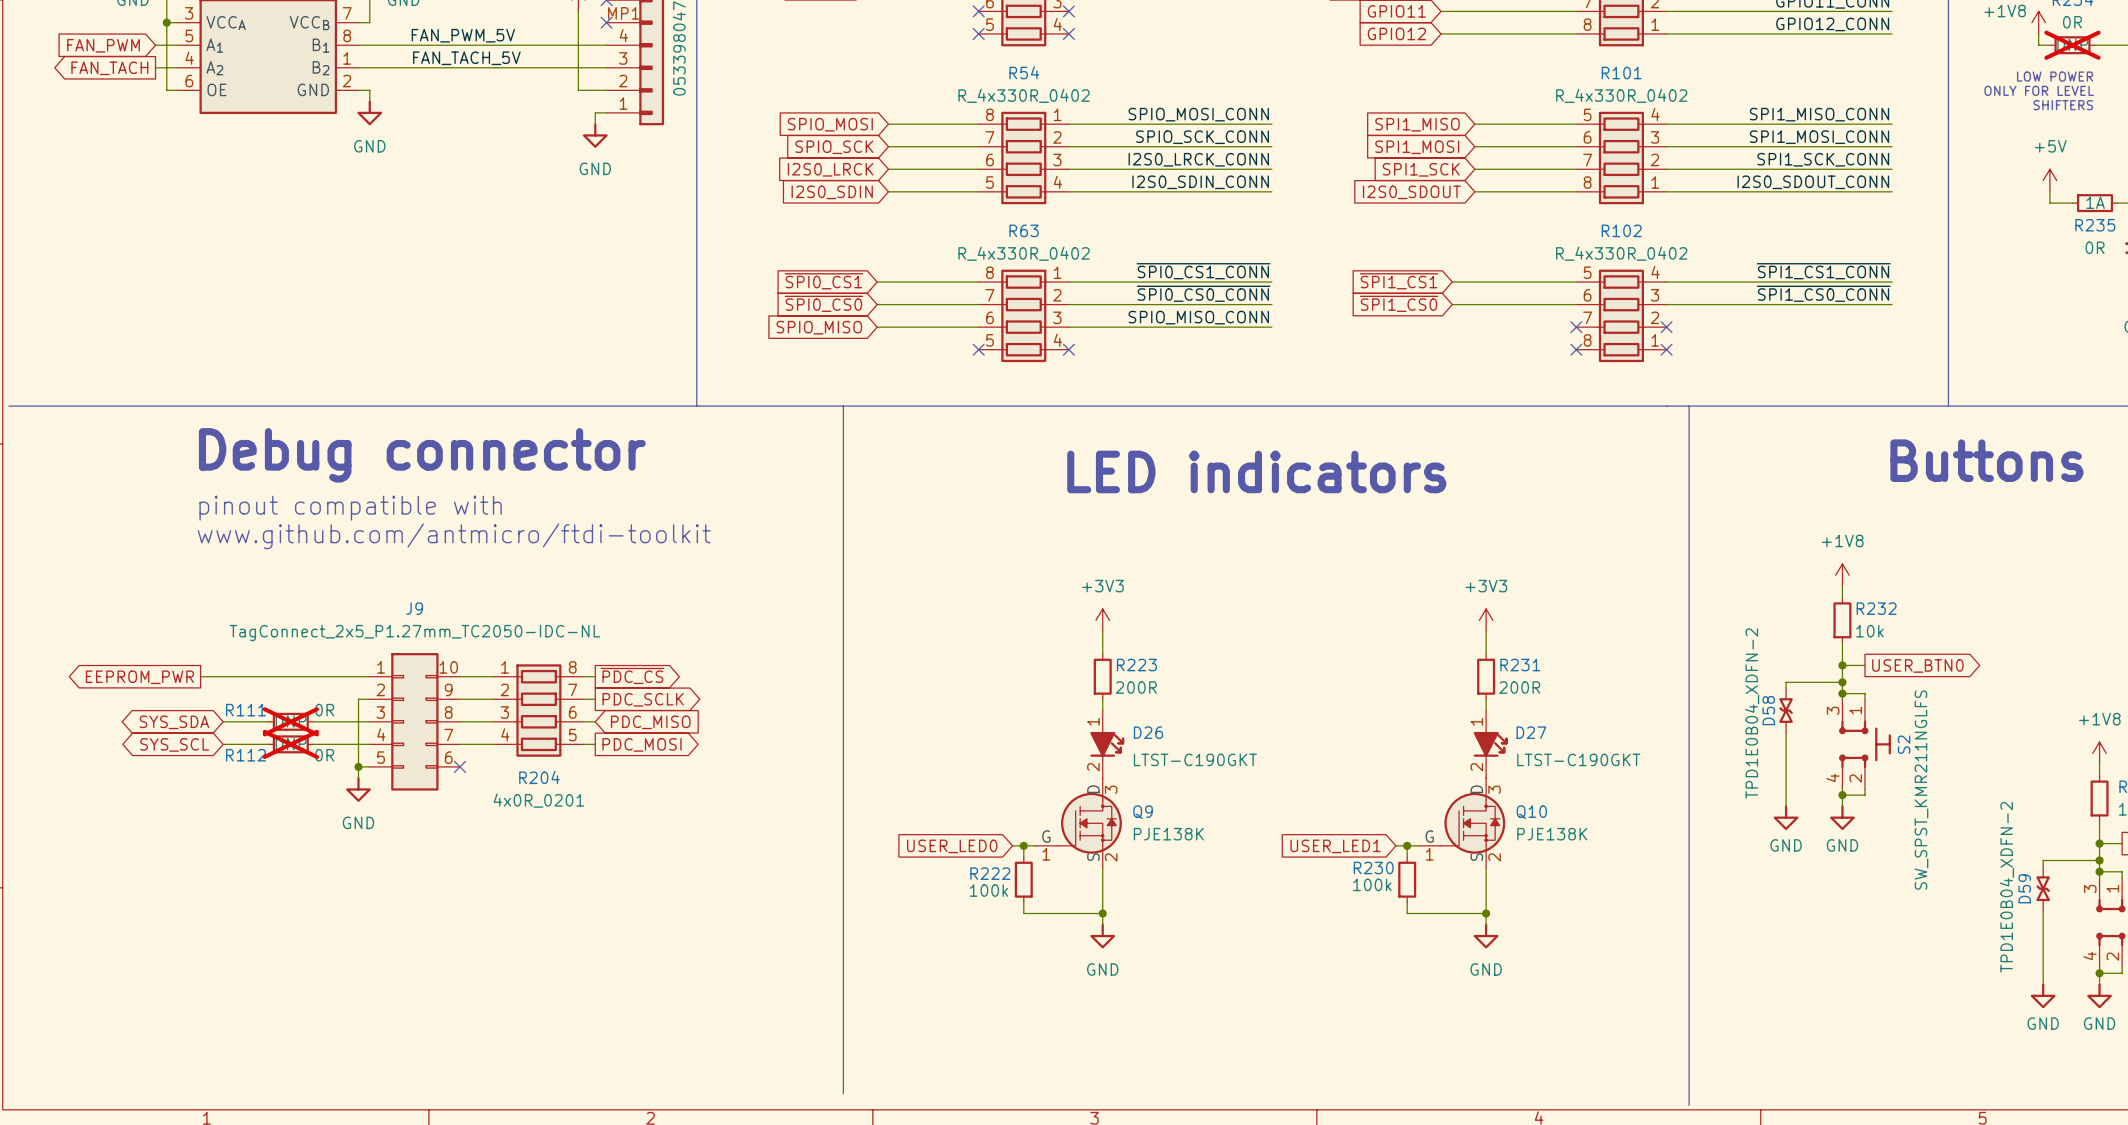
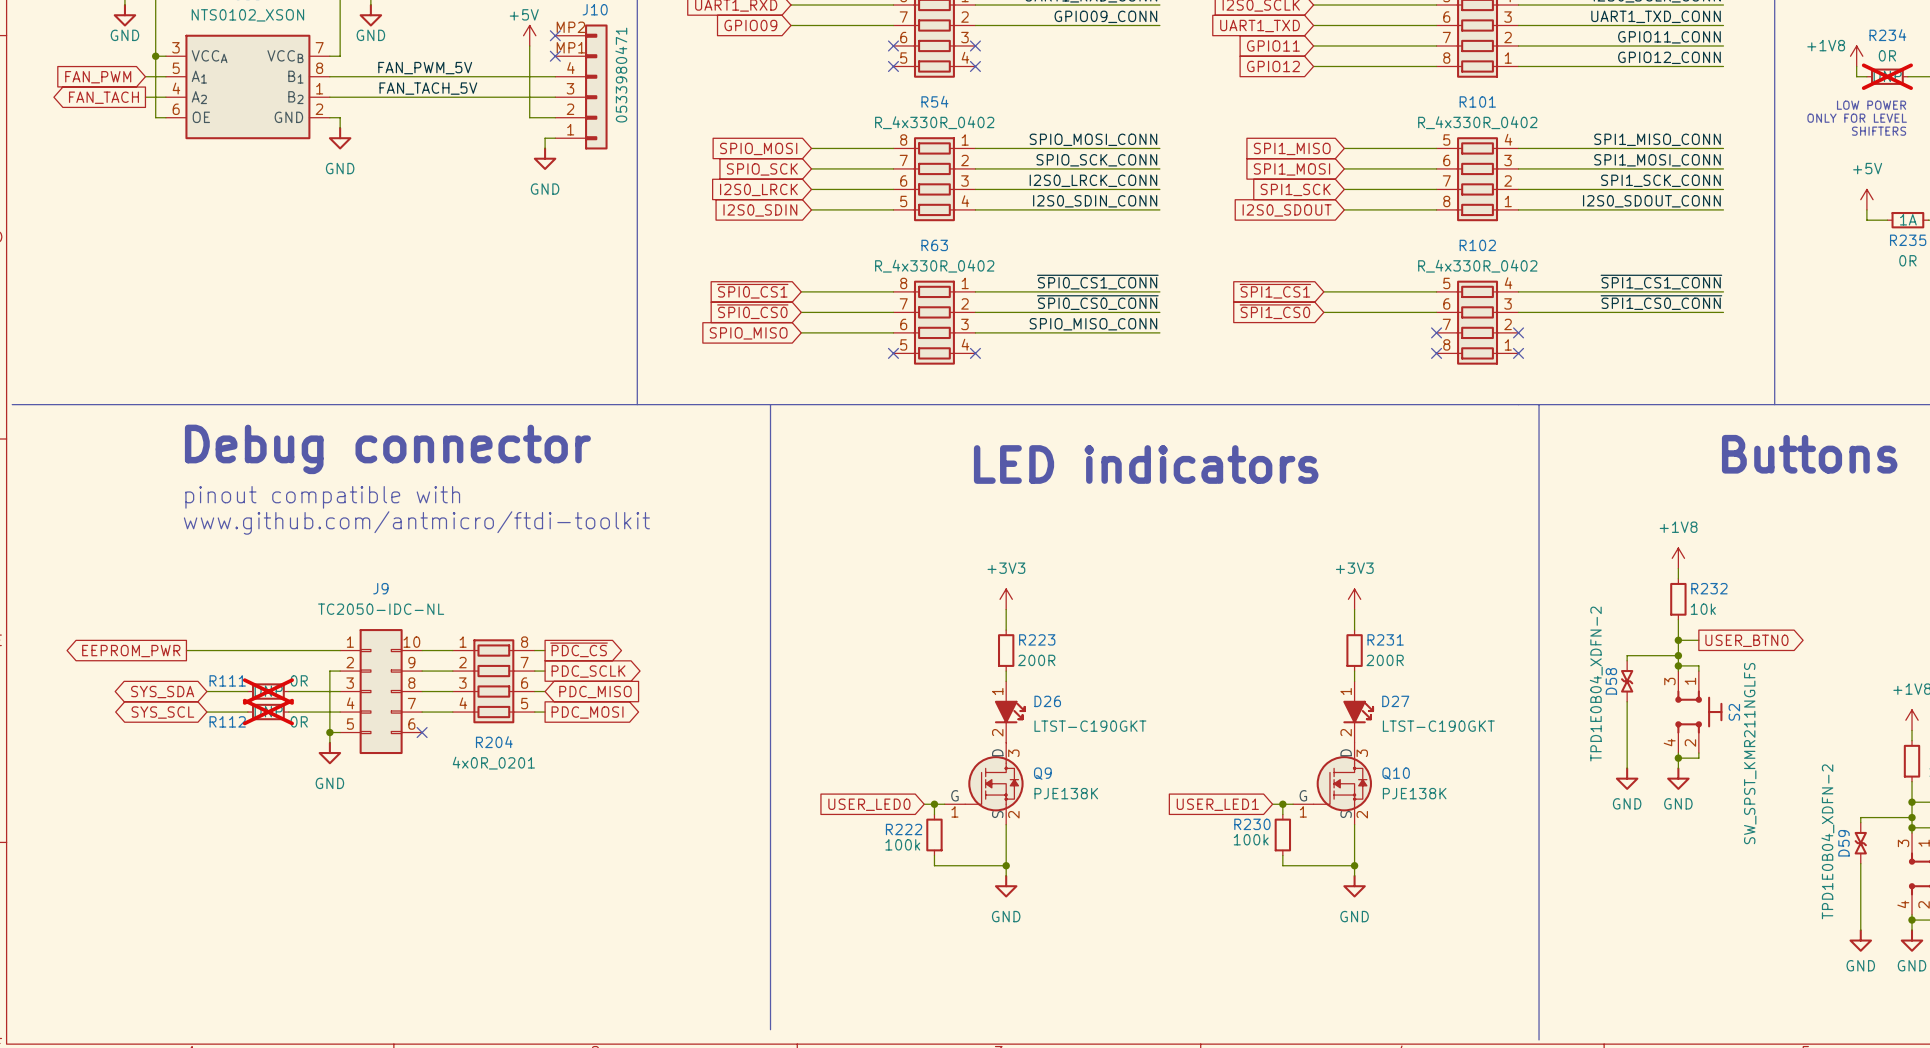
J9 text: none -> TC2050-IDC-NL (381, 609)
J9 value: TagConnect_2x5_P1.27mm_TC2050-IDC-NL (414, 633) -> none

